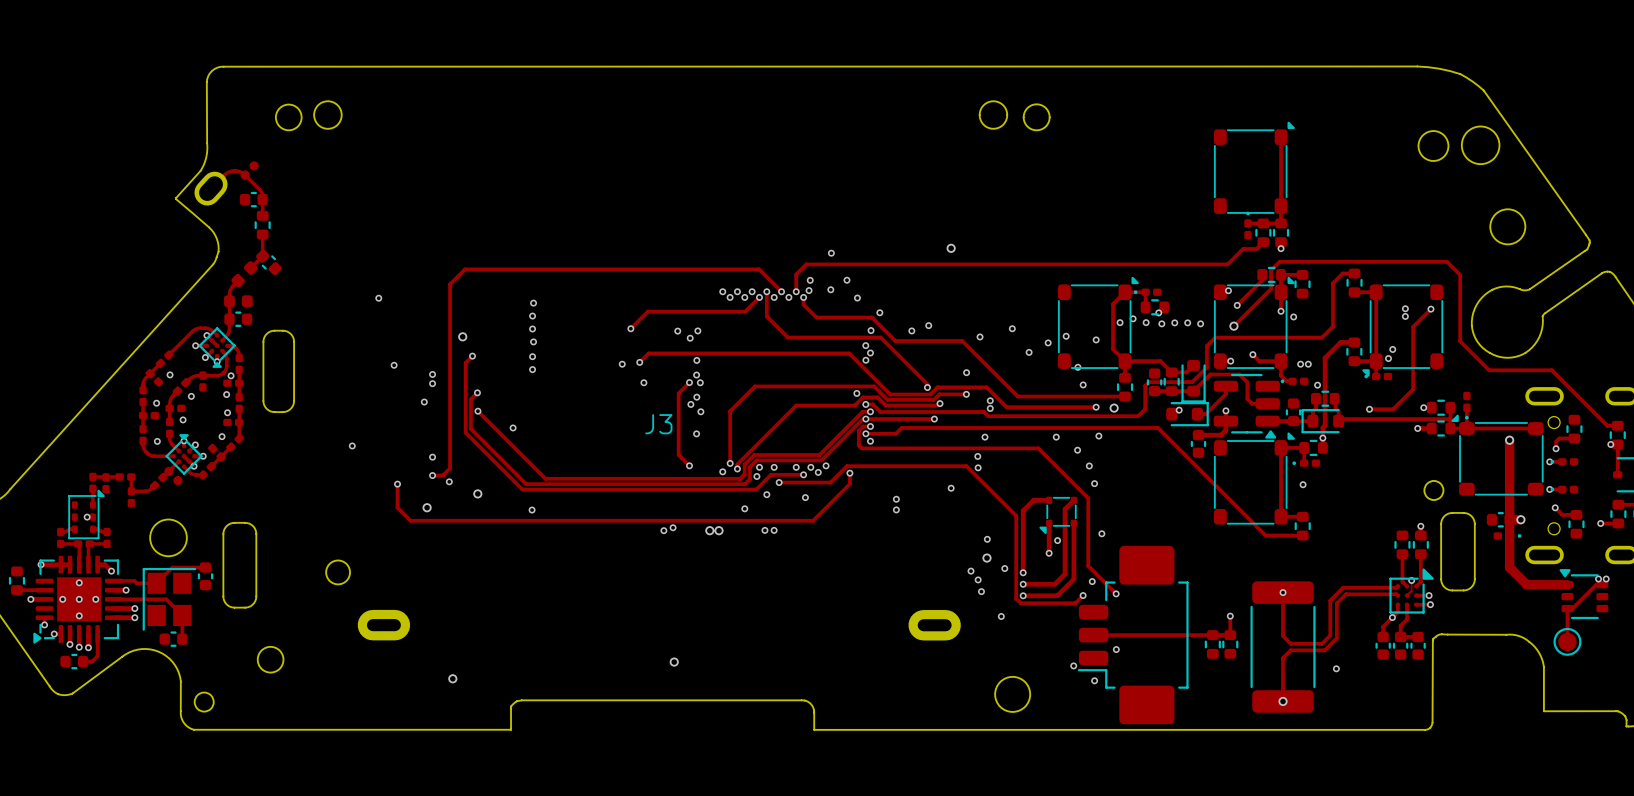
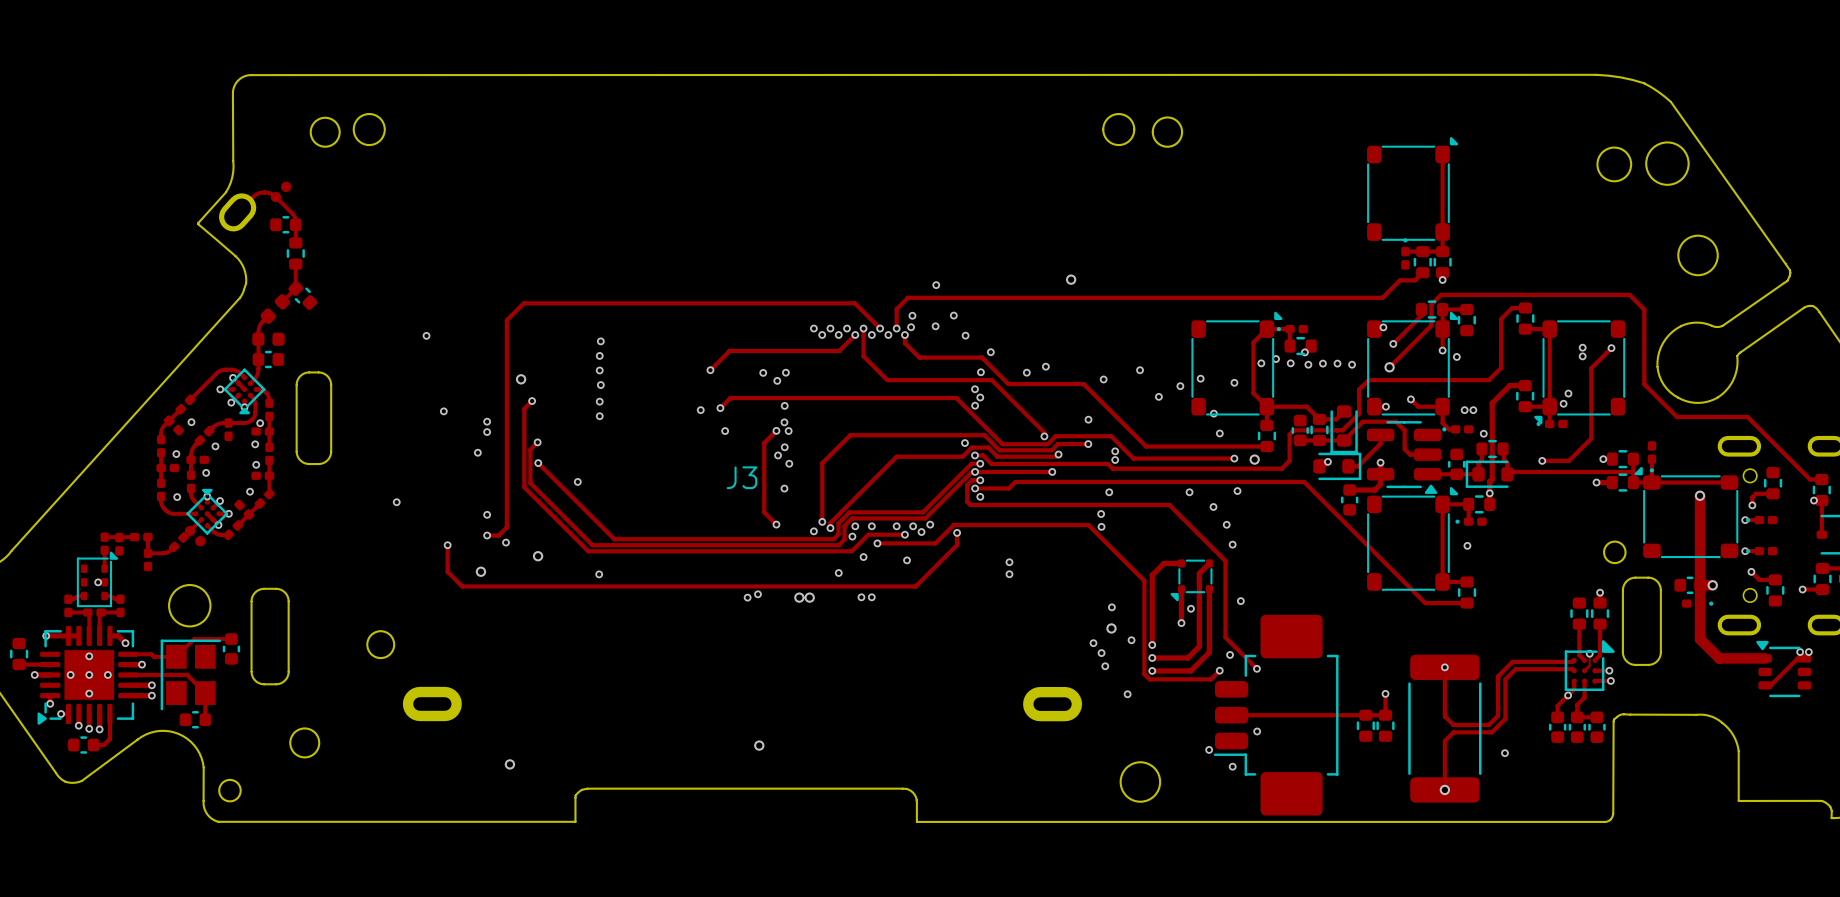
via: (951, 488) -> none
track: (1567, 608) (1567, 641) -> none
part: (1567, 641) -> none

